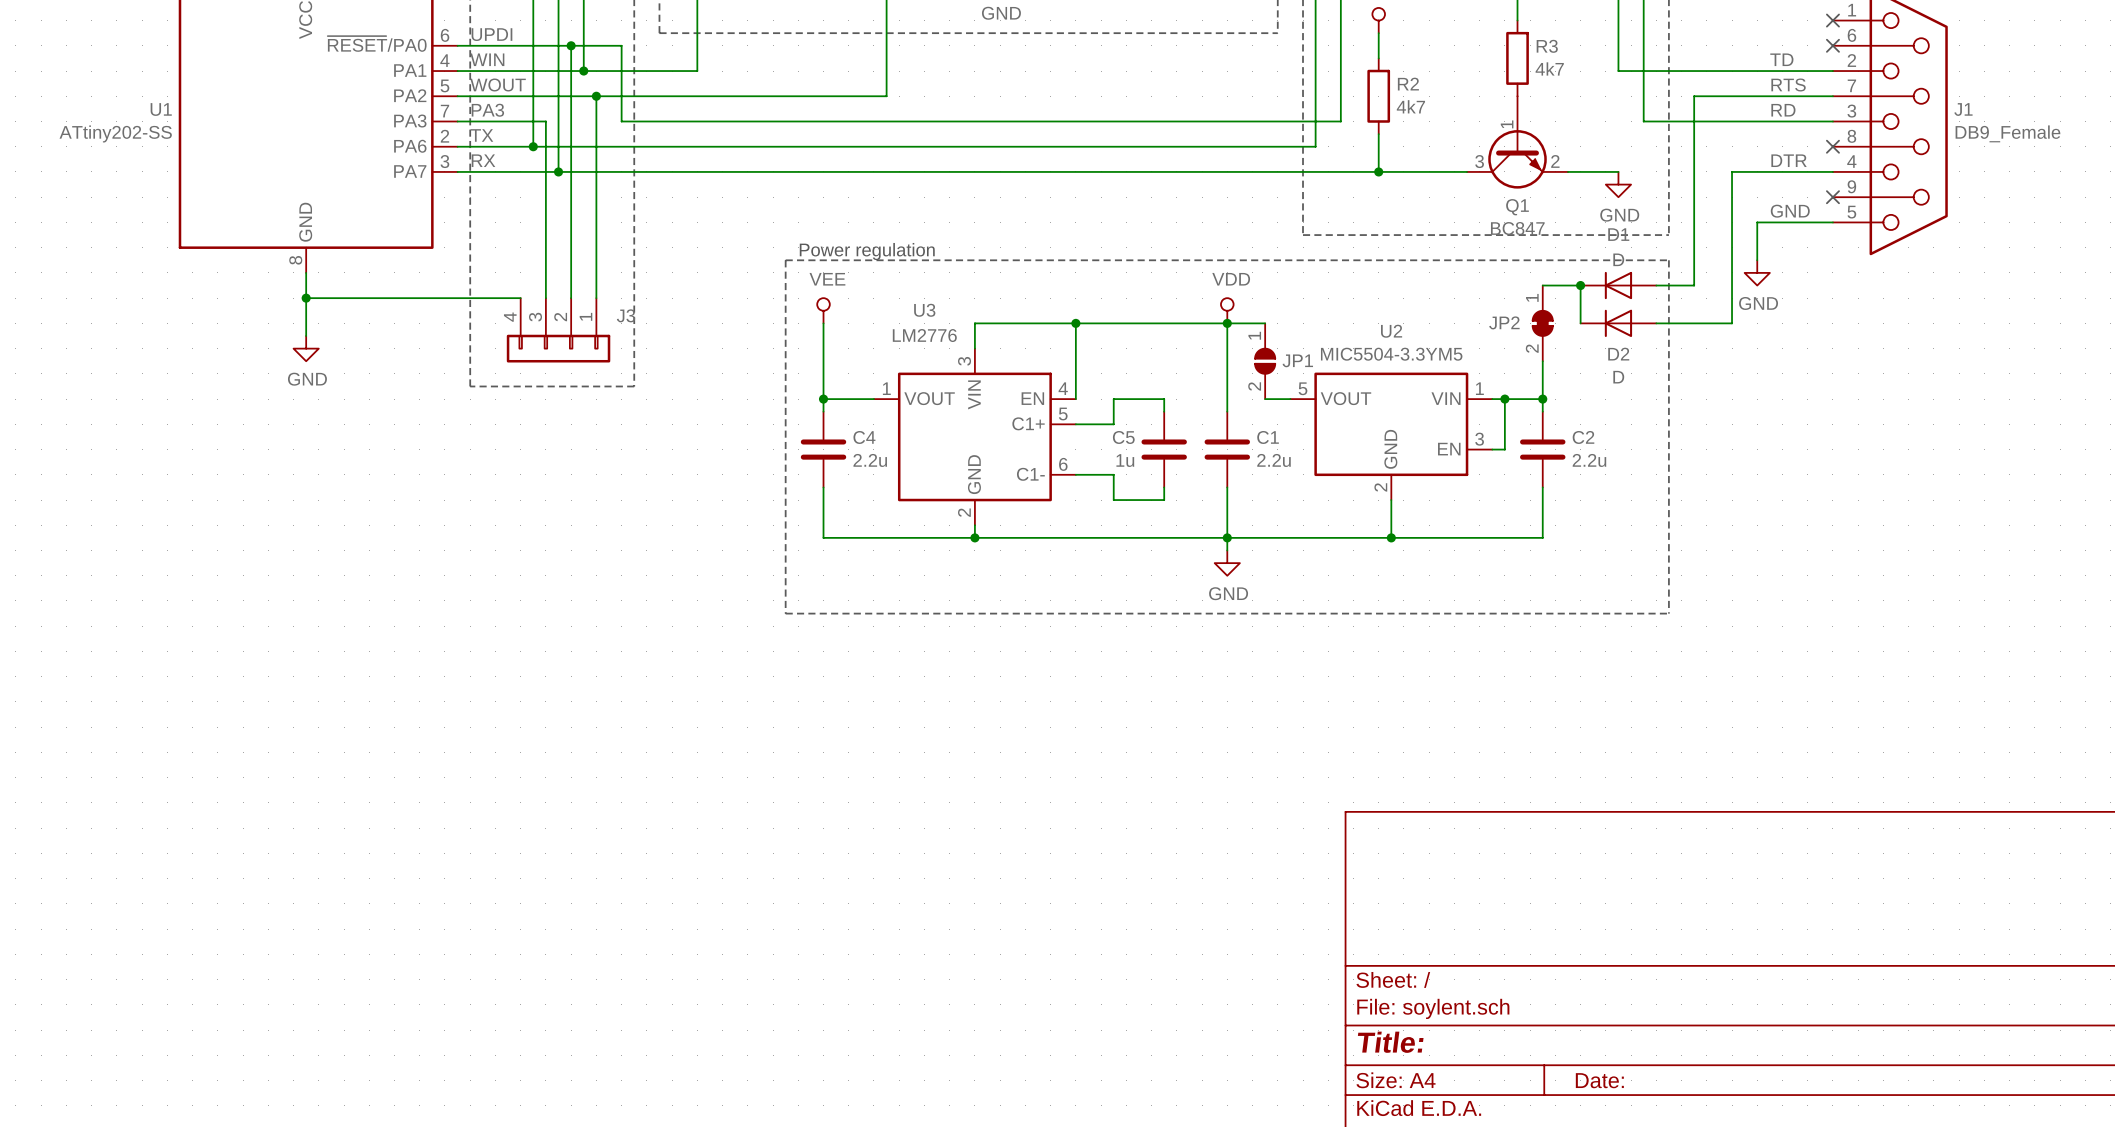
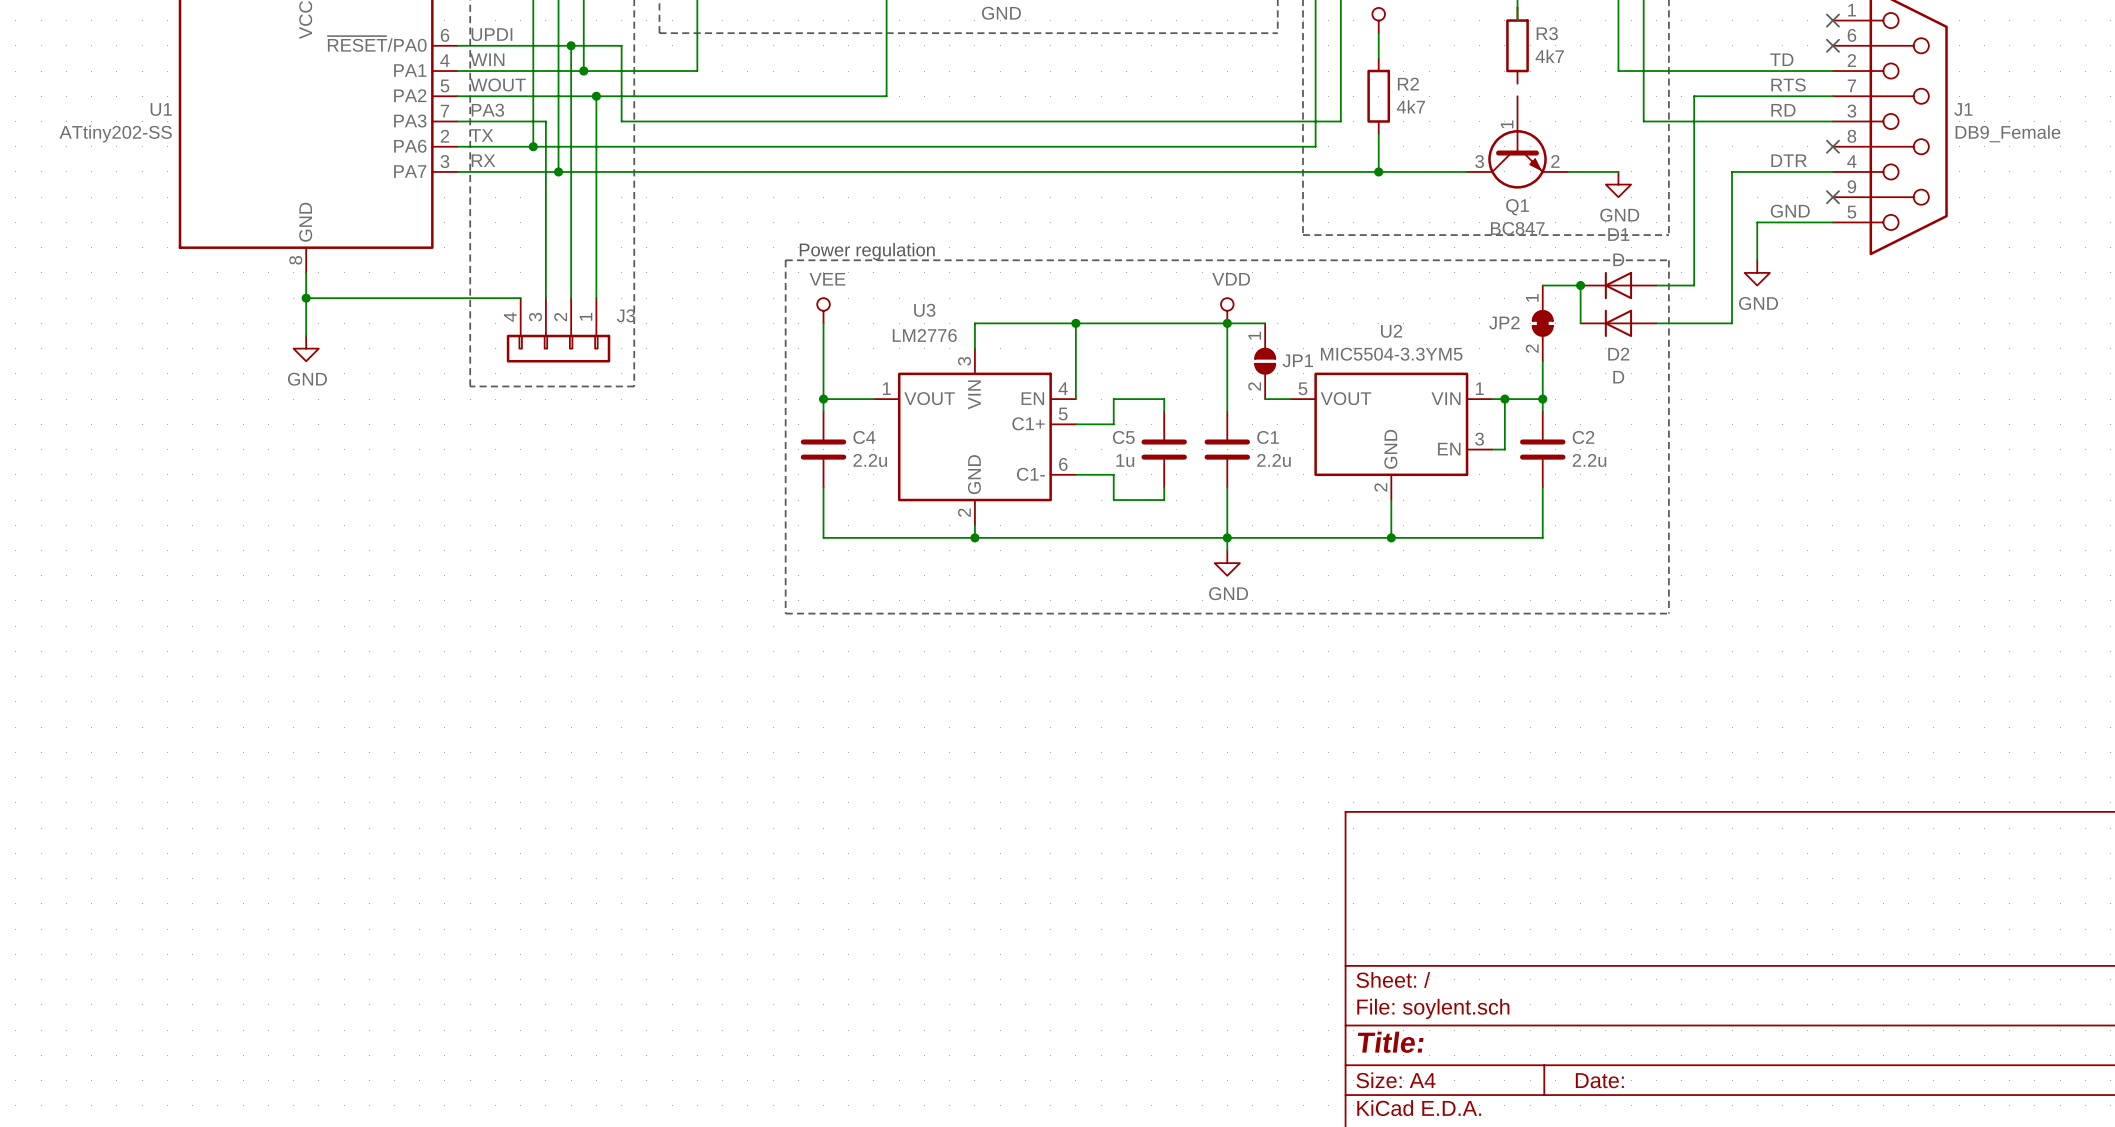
R3 position: (1517, 58) -> (1517, 45)

